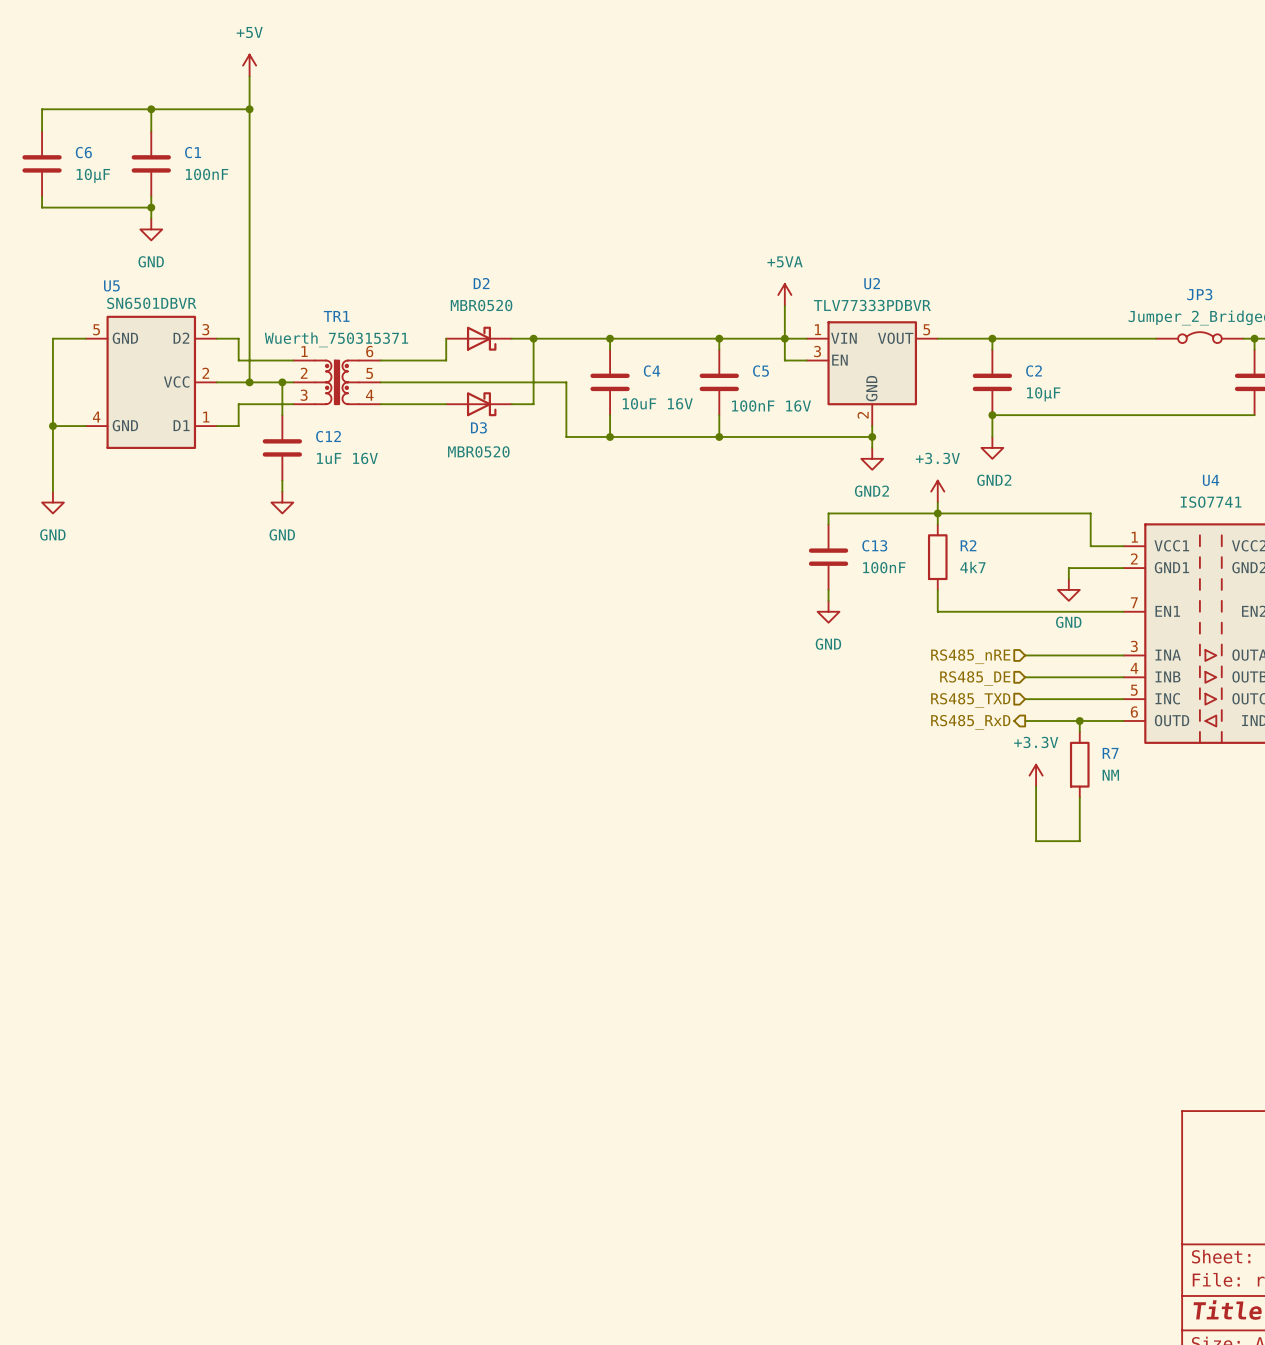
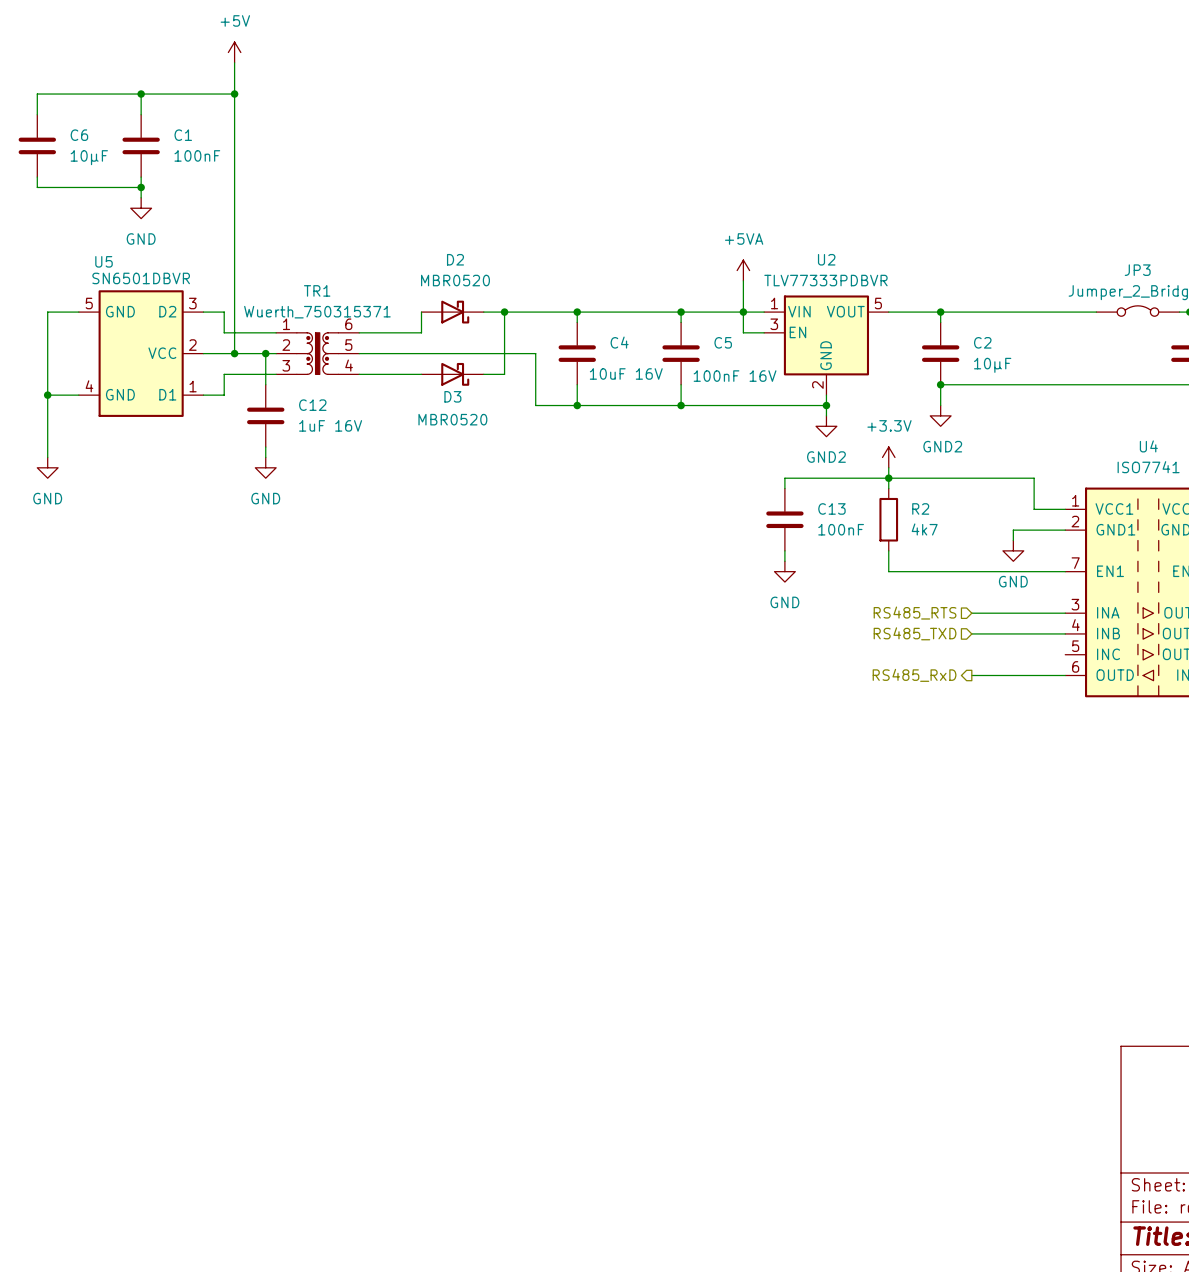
hierarchical label: RS485_nRE (970, 656) -> RS485_RTS (915, 613)
hierarchical label: RS485_DE (975, 678) -> RS485_TXD (915, 633)
wire: (1025, 699) (1123, 699) -> none
hierarchical label: RS485_TXD (970, 700) -> none
wire: (1079, 721) (1079, 731) -> none
junction: (1079, 721) -> none
R7: NM (1079, 764) -> none
power symbol: +3.3V (1036, 775) -> none
wire: (1036, 786) (1036, 841) (1079, 841) (1079, 797) -> none

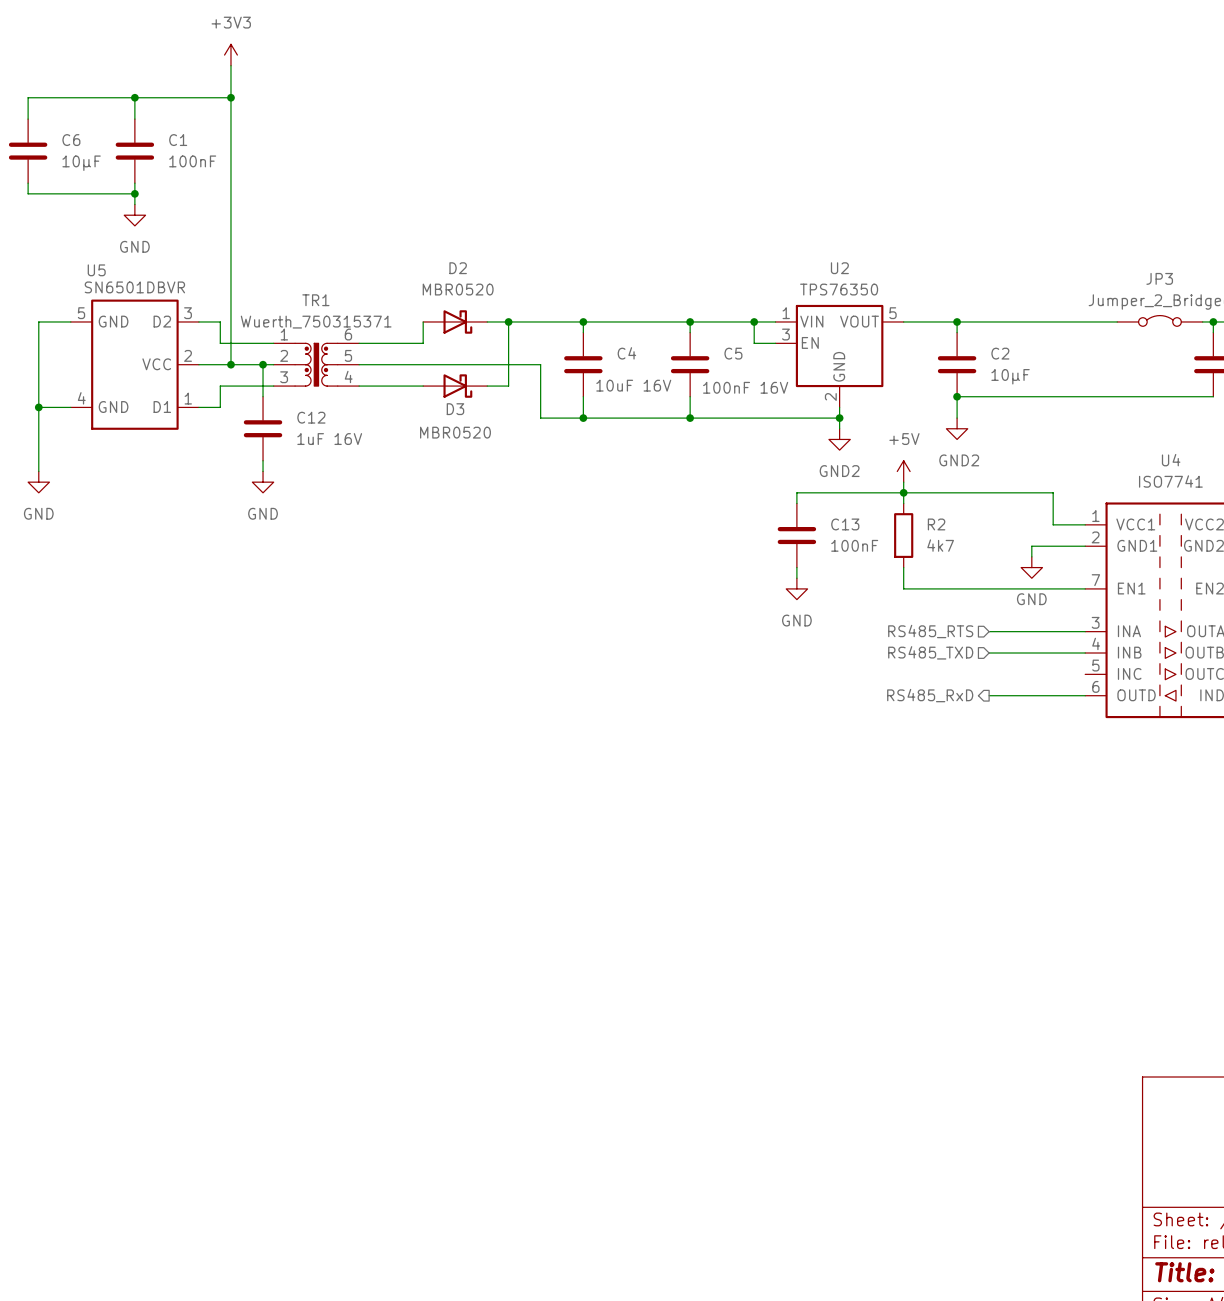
power symbol: +5V (234, 52) -> +3V3 (230, 55)
power symbol: +5VA (743, 270) -> none
wire: (743, 280) (743, 312) -> none
U2 value: TLV77333PDBVR (825, 280) -> TPS76350 (839, 289)
power symbol: +3.3V (888, 457) -> +5V (903, 471)

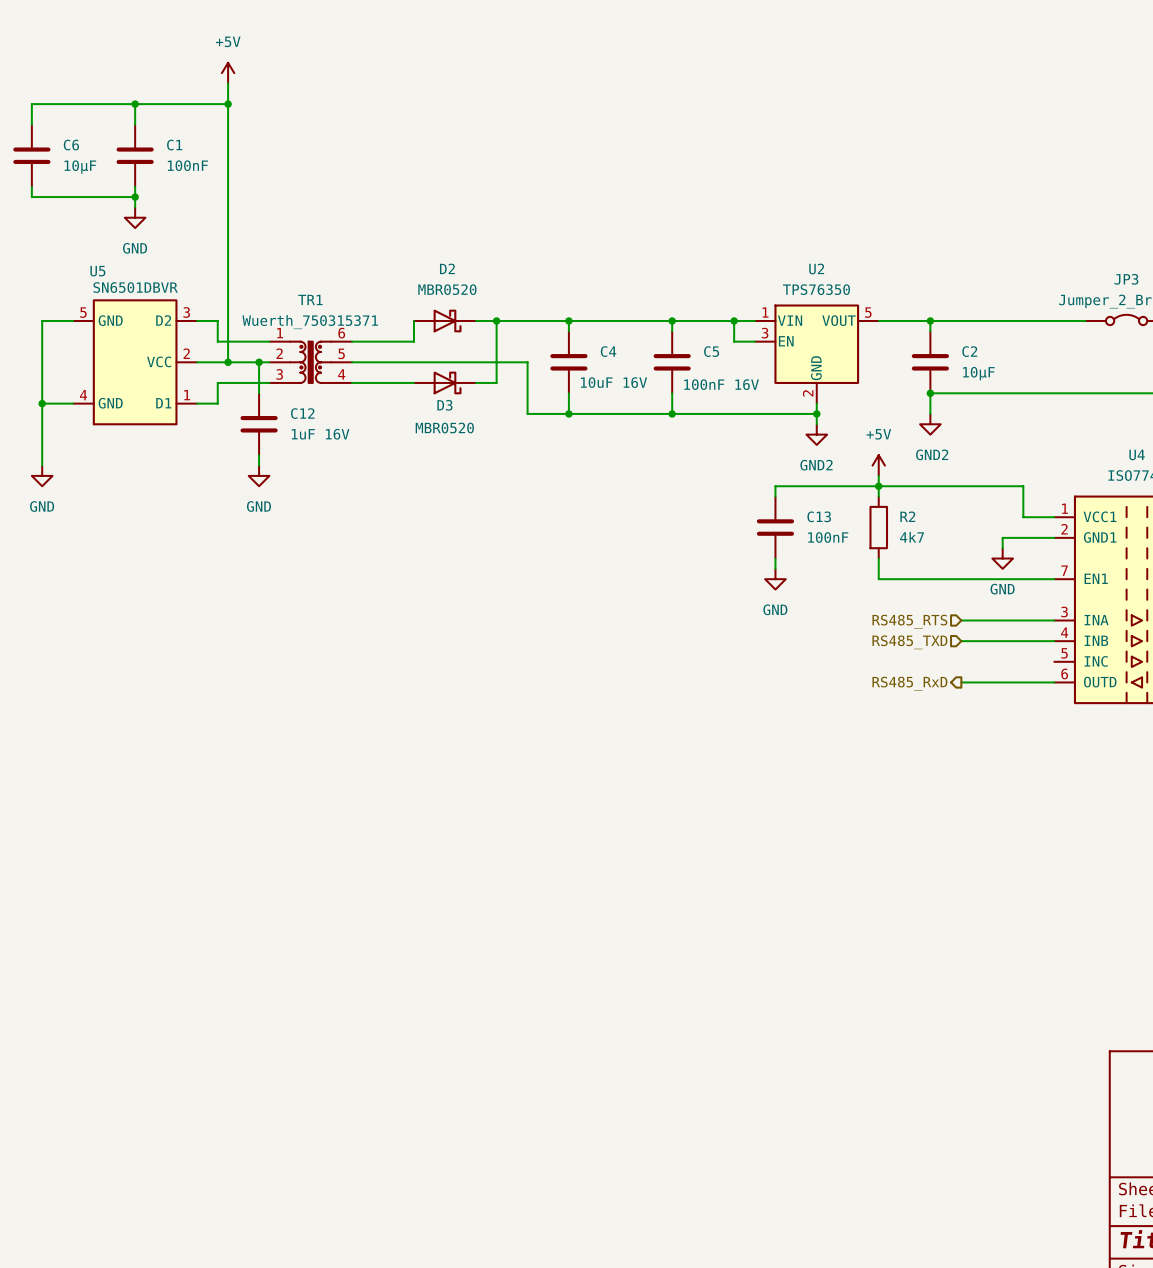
power symbol: +3V3 (230, 55) -> none
power symbol: none -> +5V (228, 73)

